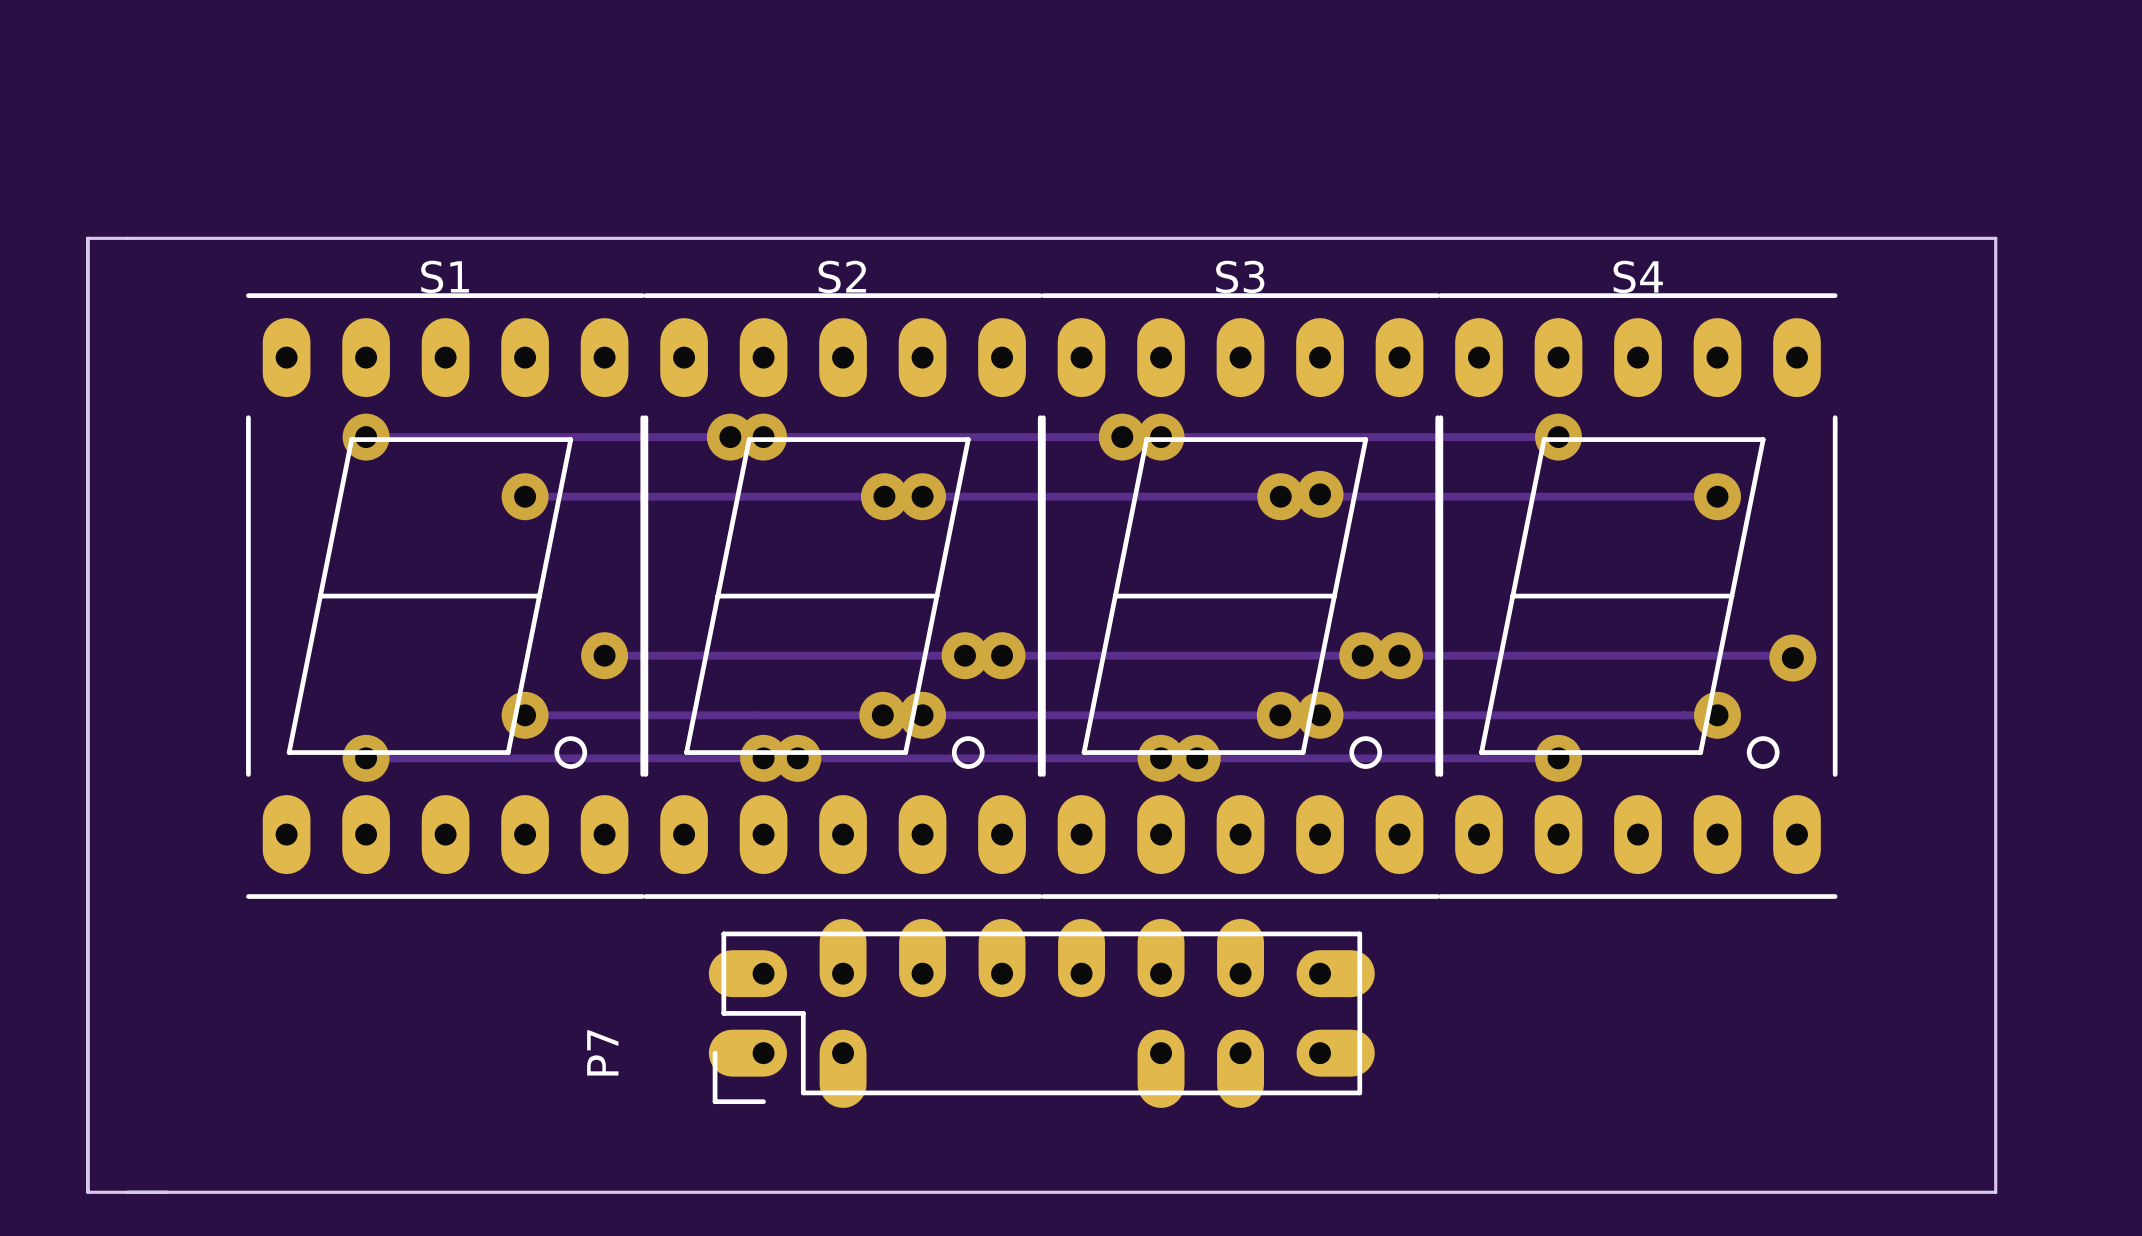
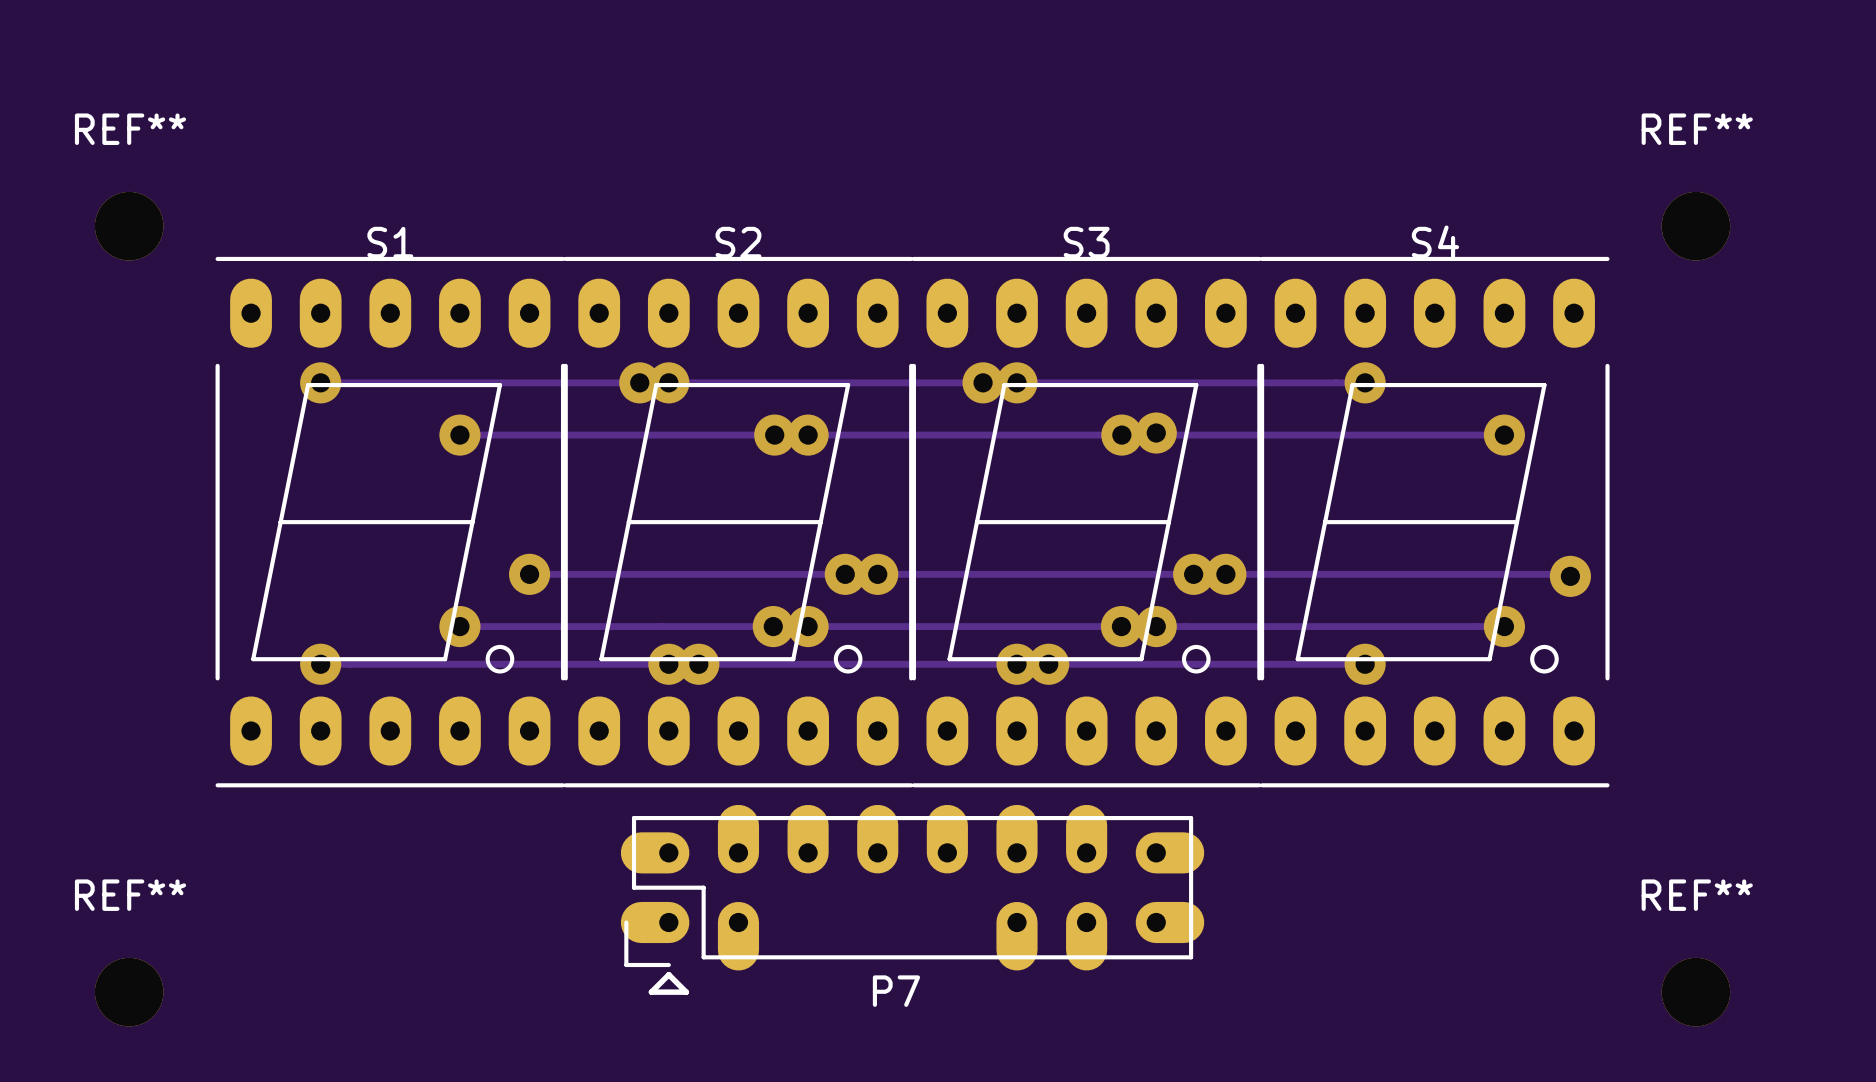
board edge: (87, 238) (87, 1192) (1995, 1192) (1995, 238) (87, 238) -> none
REF**: none -> (129, 226)
REF**: none -> (1695, 226)
P7 name rotation: 0° (602, 1052) -> 90° clockwise (896, 991)
P7 name position: P7 (602, 1052) -> P7 (896, 991)
line: none -> (668, 974) (686, 992) (651, 992) (668, 974)
REF**: none -> (129, 992)
REF**: none -> (1695, 992)

